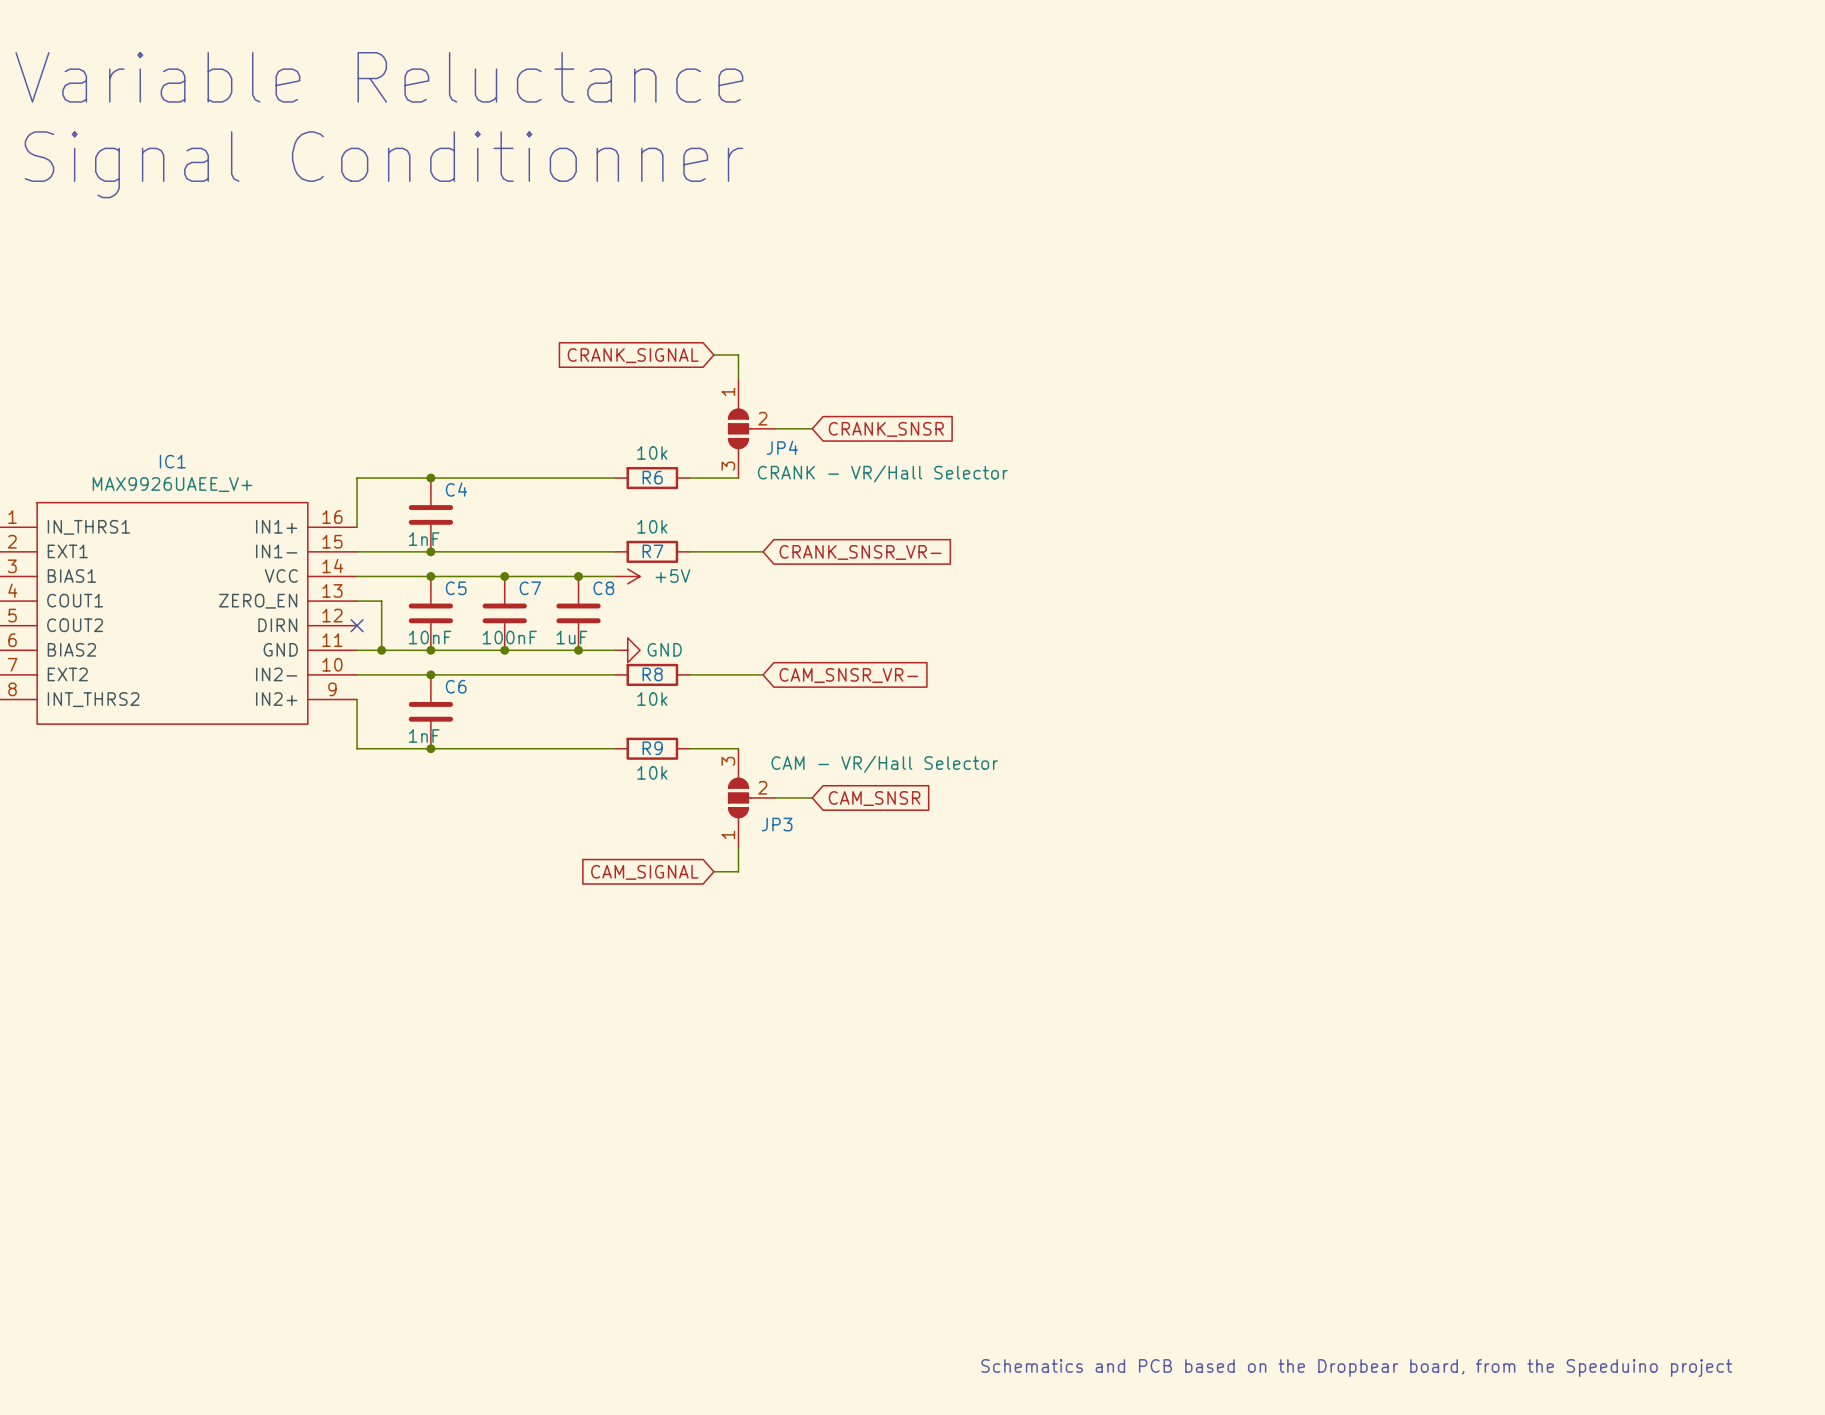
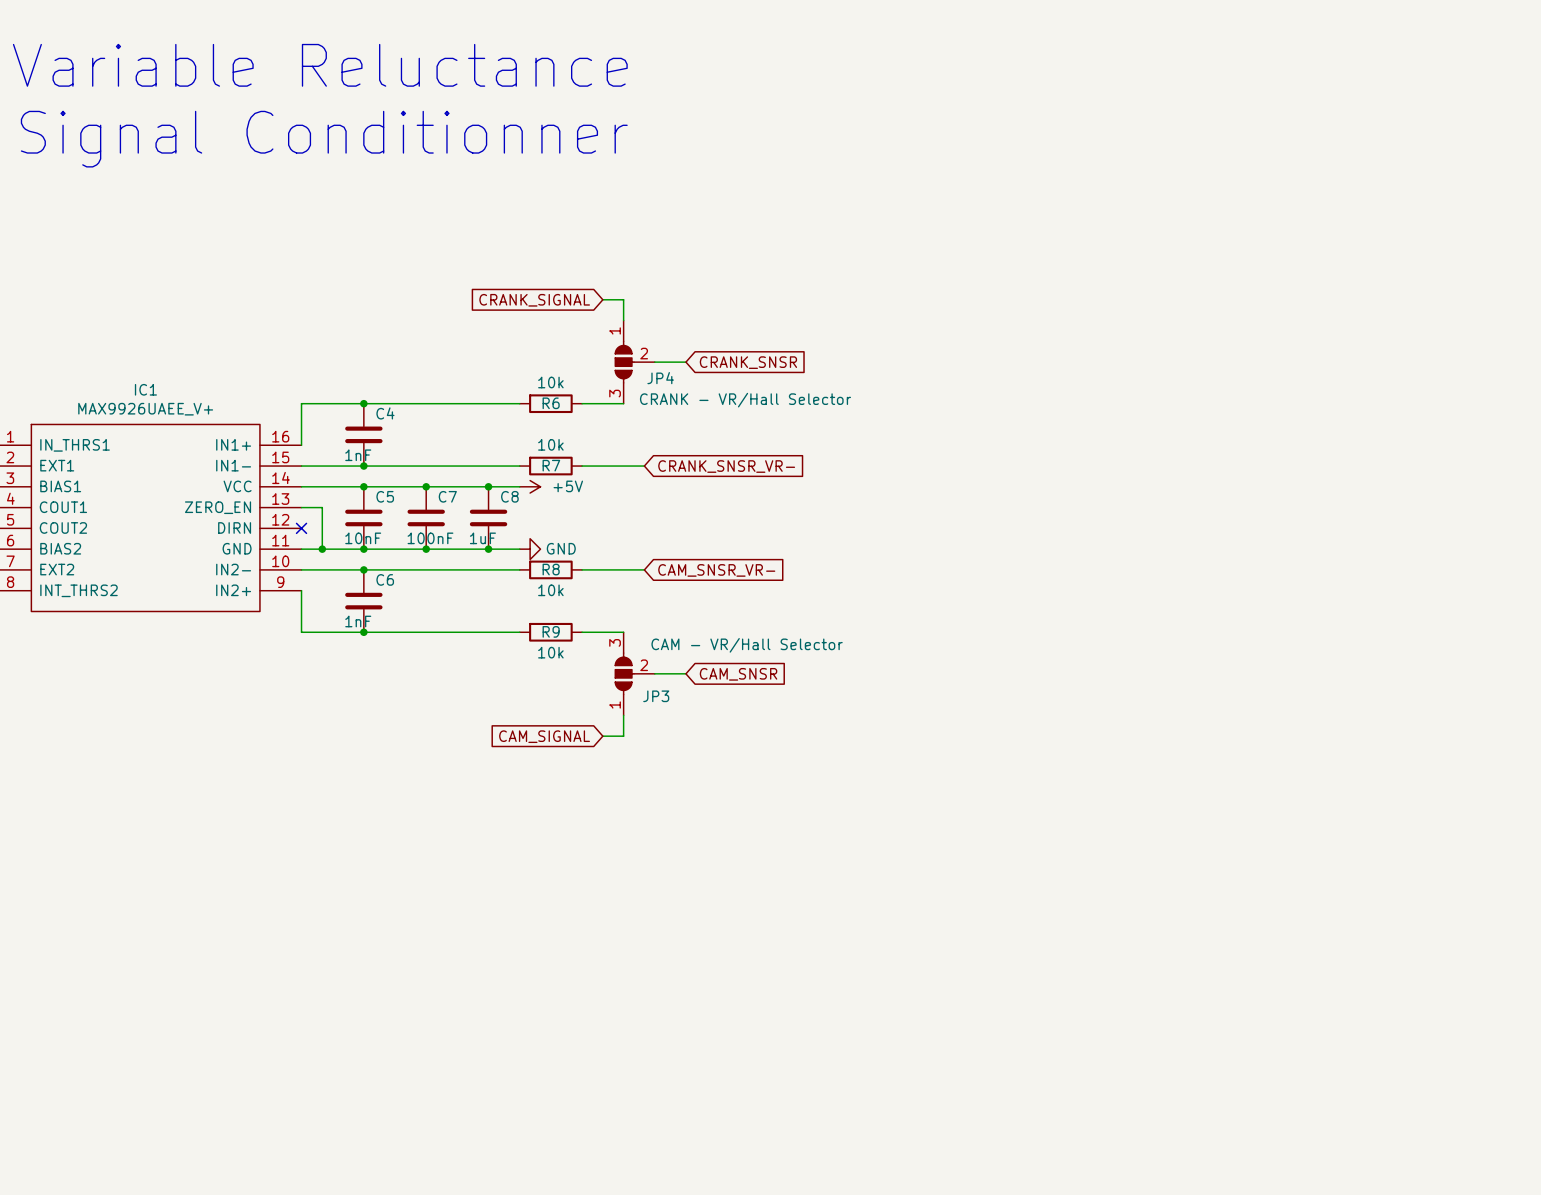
text: Schematics and PCB based on the Dropbear board, from the Speeduino project (1356, 1368) -> none

